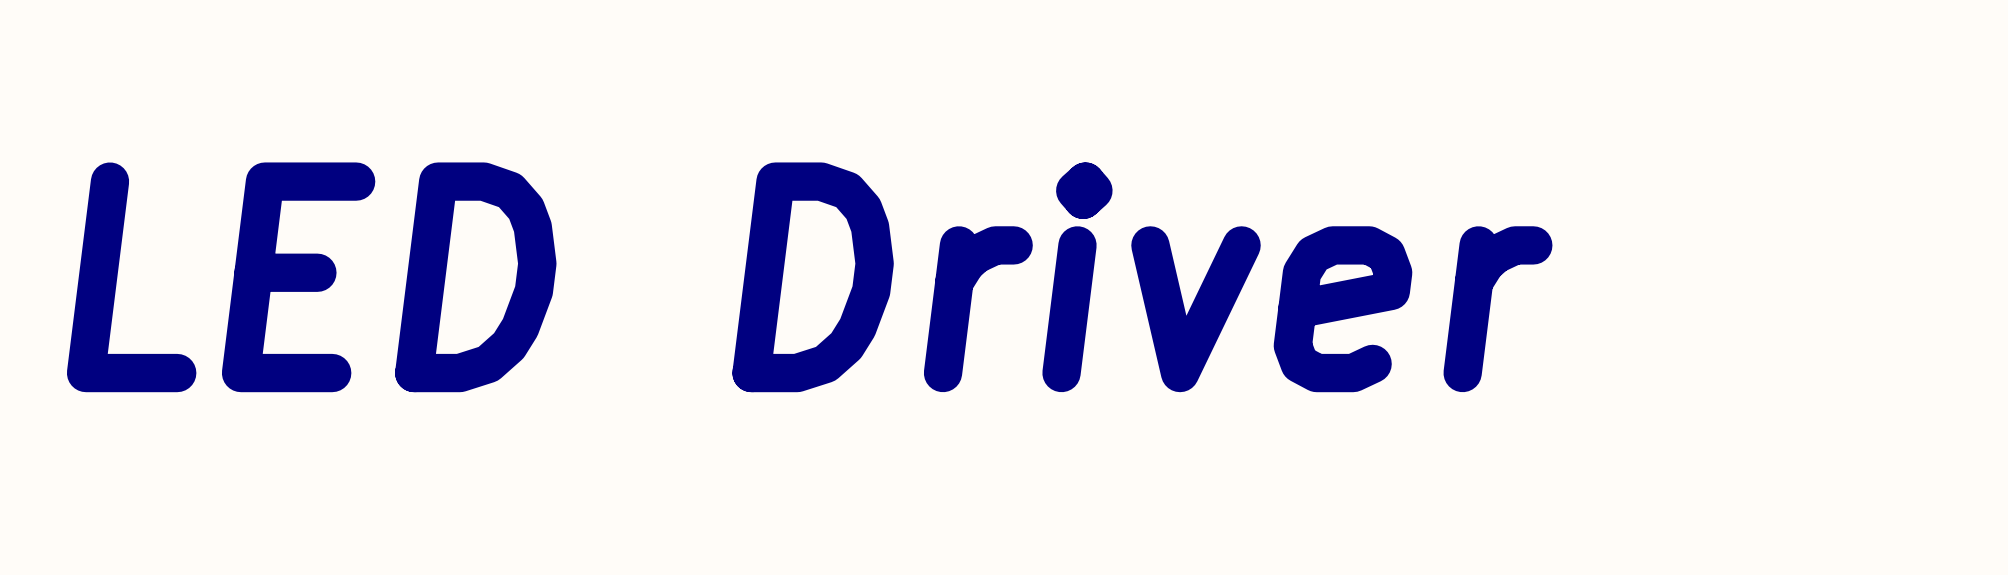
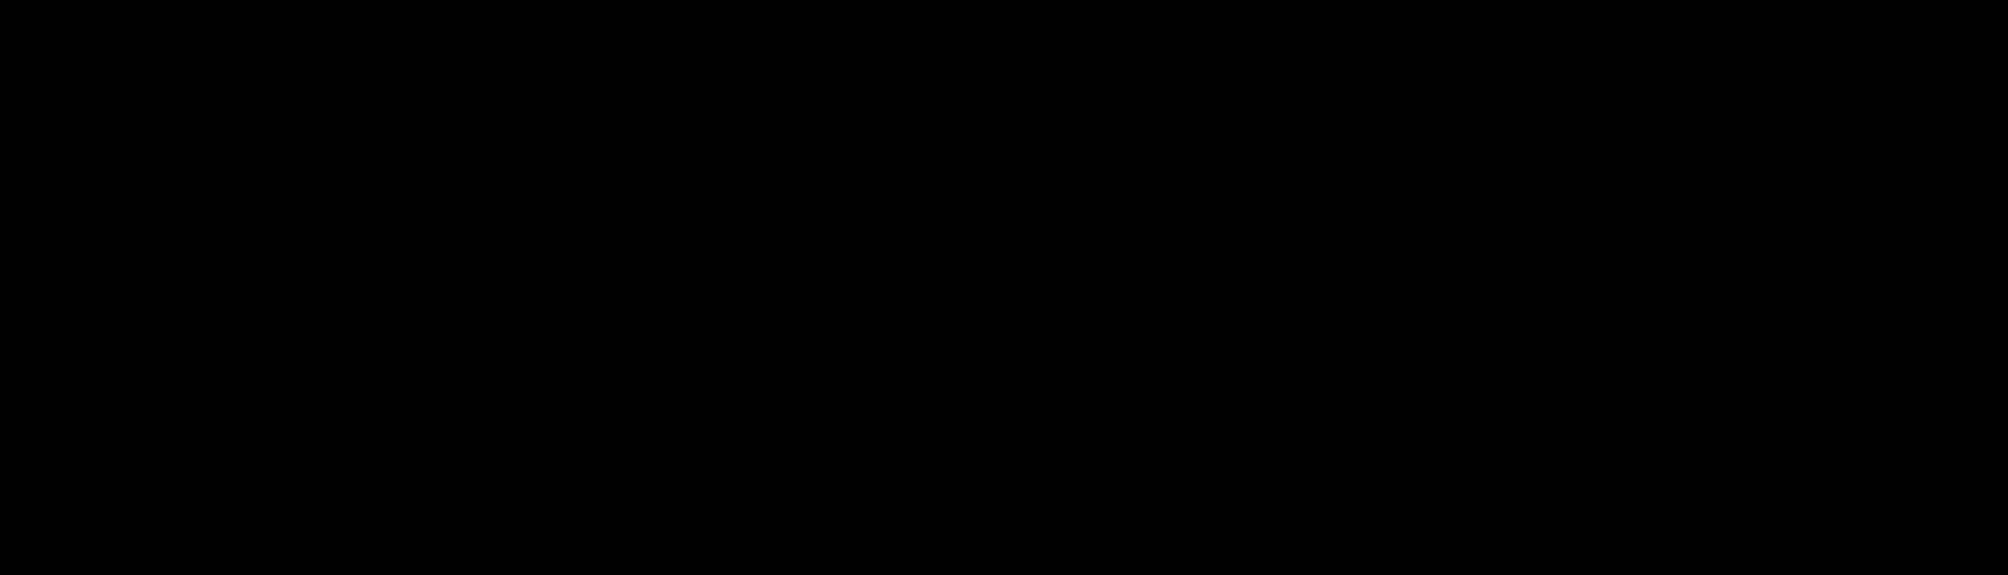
text: LED Driver (809, 277) -> none

